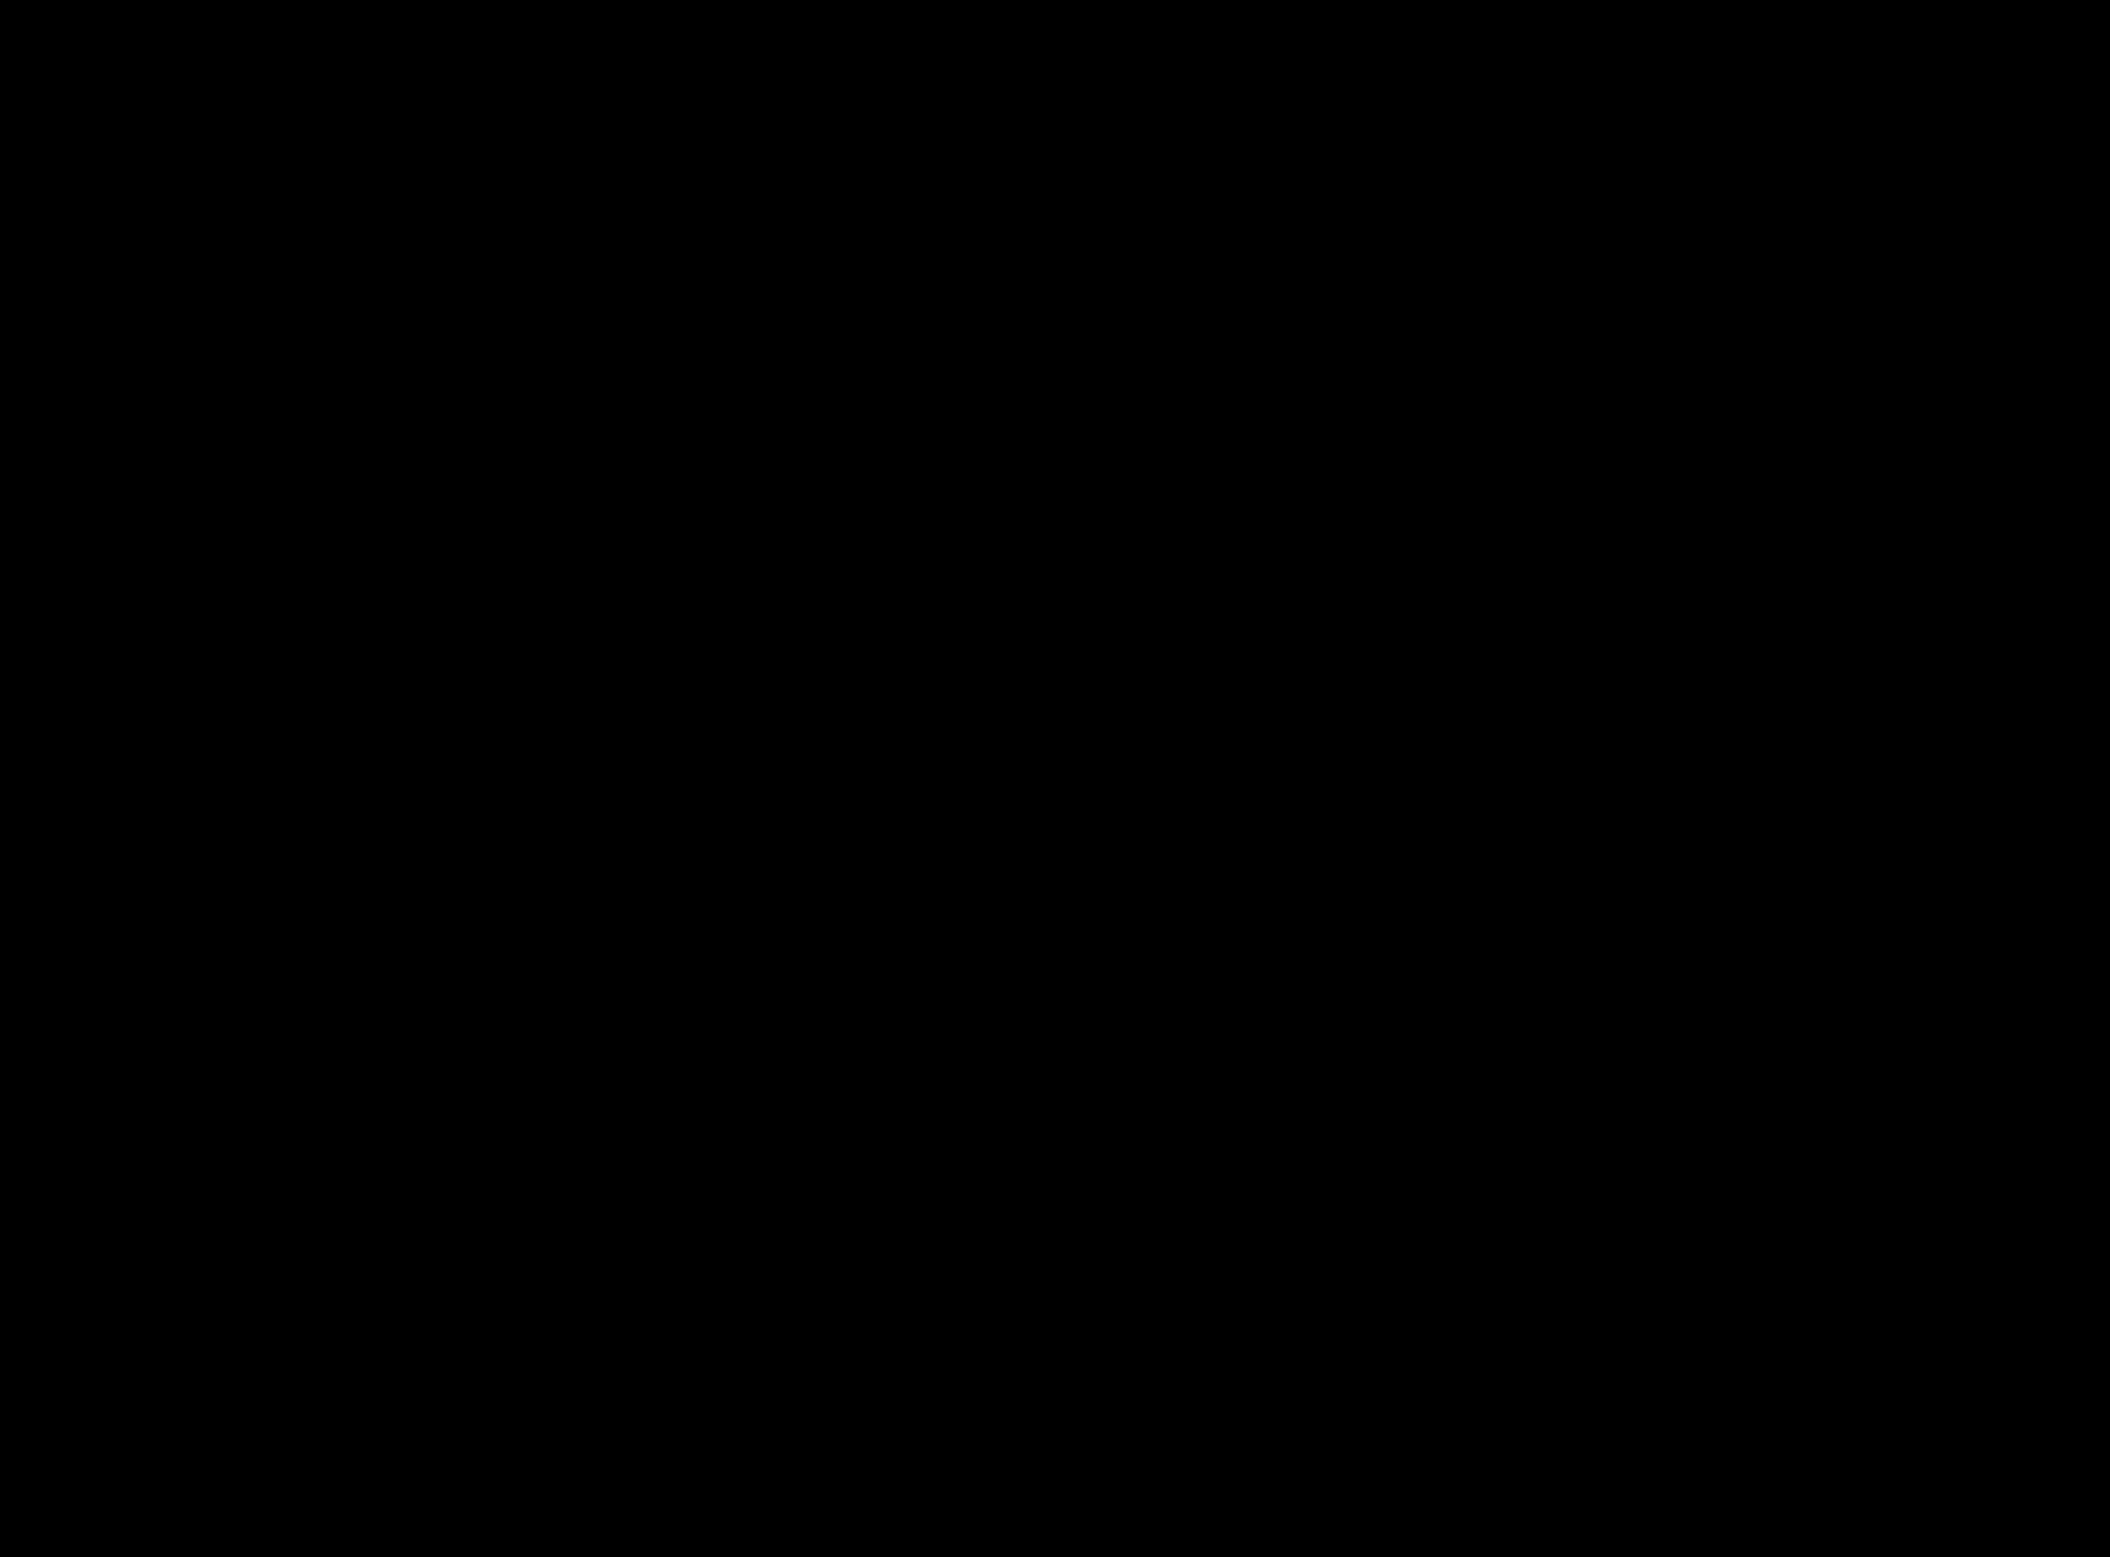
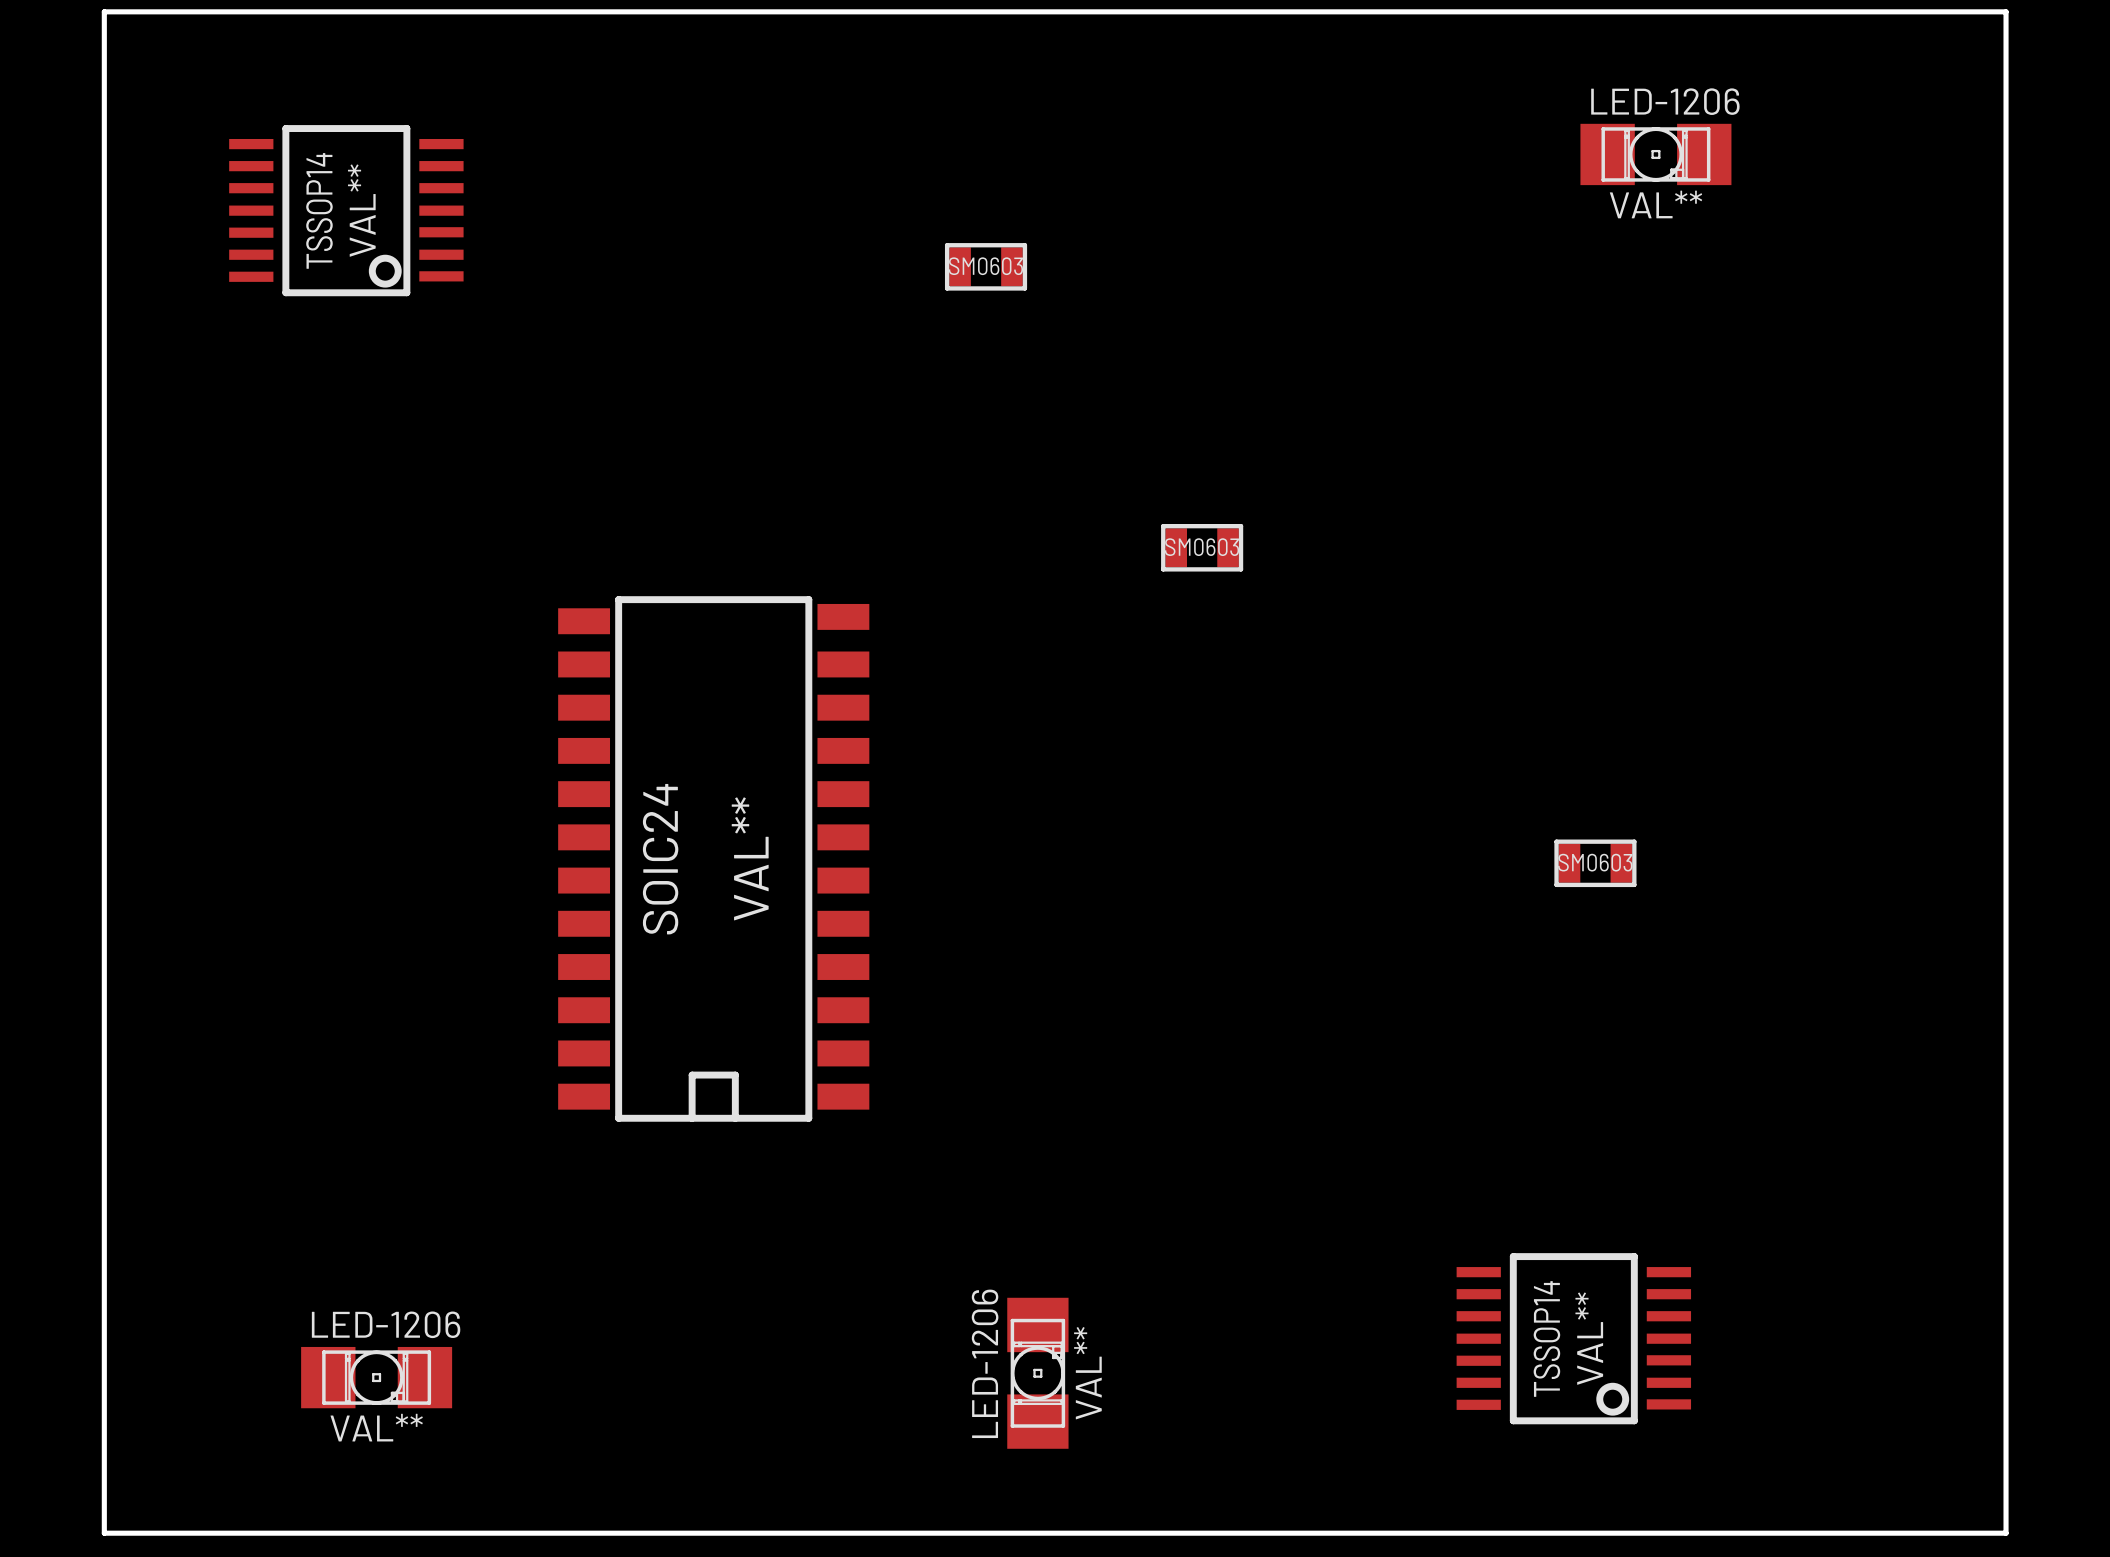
board edge: none -> (104, 11) (2006, 11) (2006, 1533) (104, 1533) (104, 11)
LED-1206: none -> VAL** (1655, 154)
TSSOP14: none -> VAL** (346, 210)
SM0603: none -> (986, 266)
SM0603: none -> (1202, 547)
SOIC24: none -> VAL** (713, 858)
SM0603: none -> (1595, 863)
TSSOP14: none -> VAL** (1573, 1338)
LED-1206: none -> VAL** (1037, 1373)
LED-1206: none -> VAL** (376, 1377)

